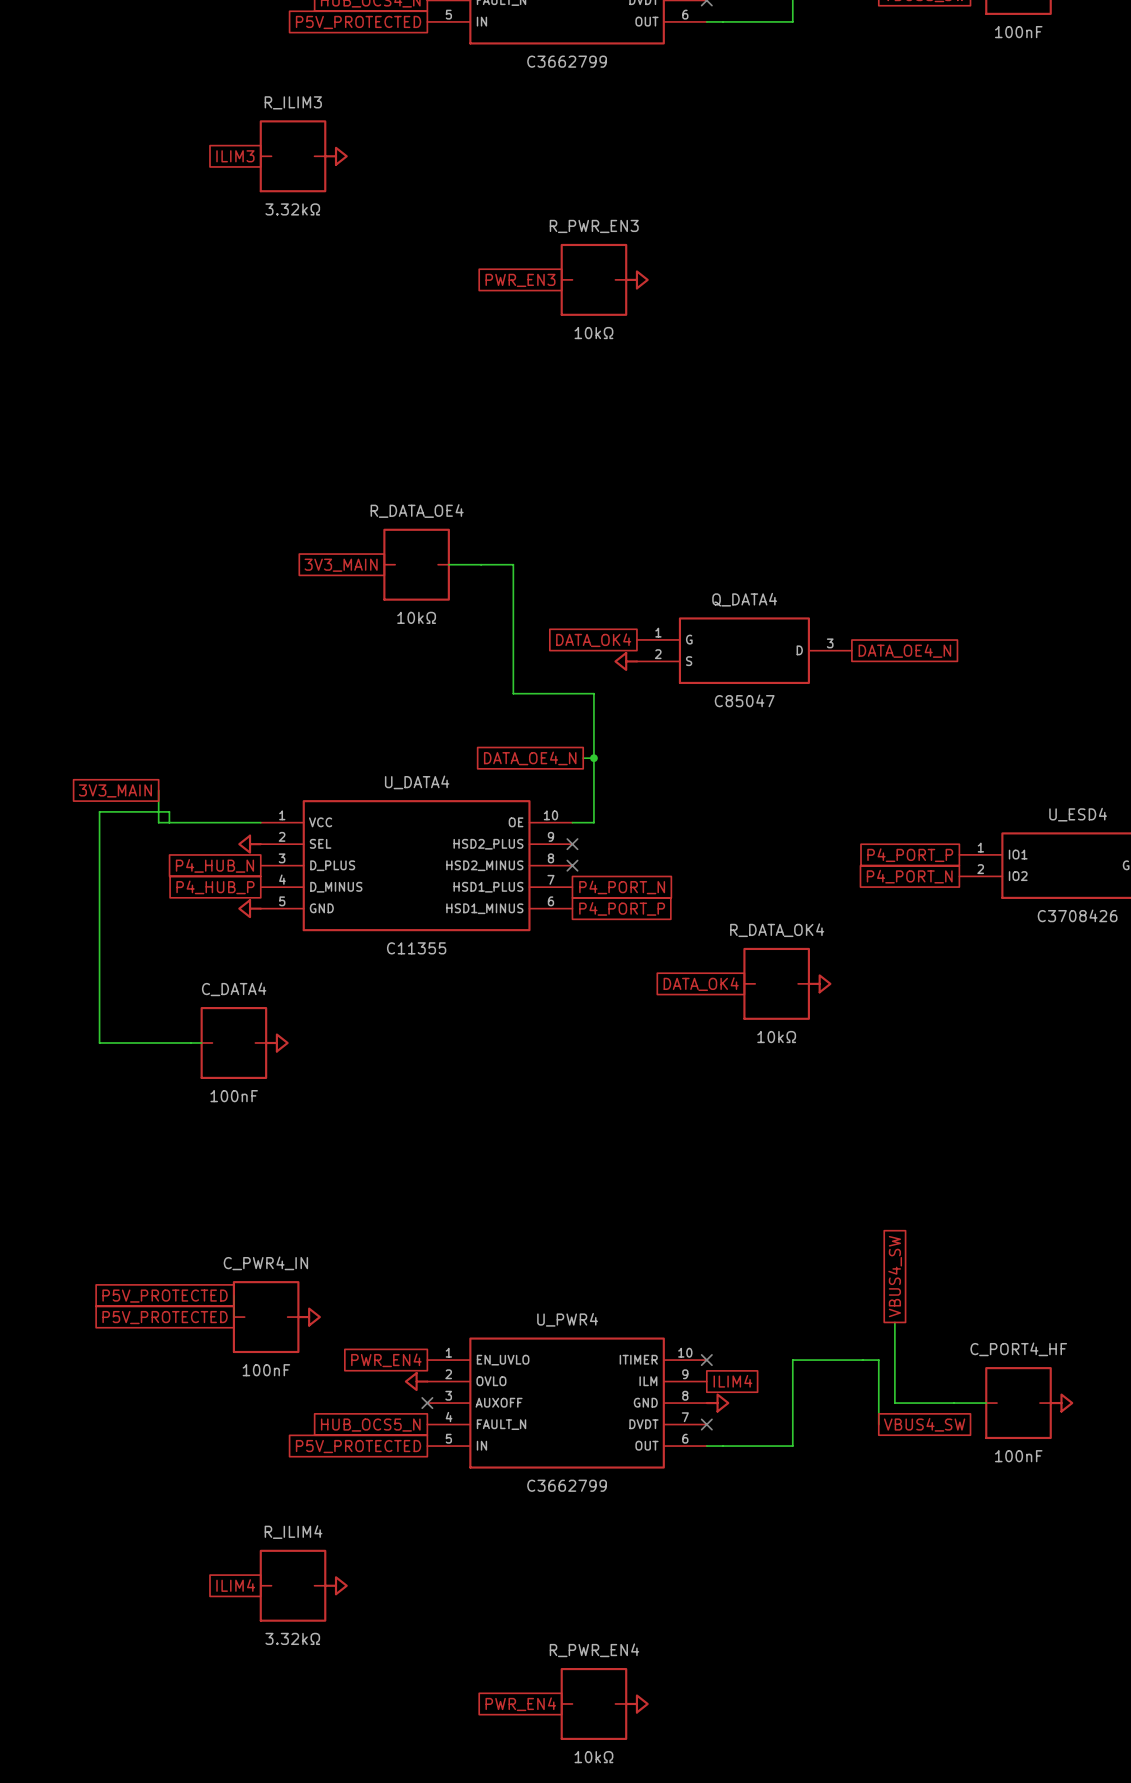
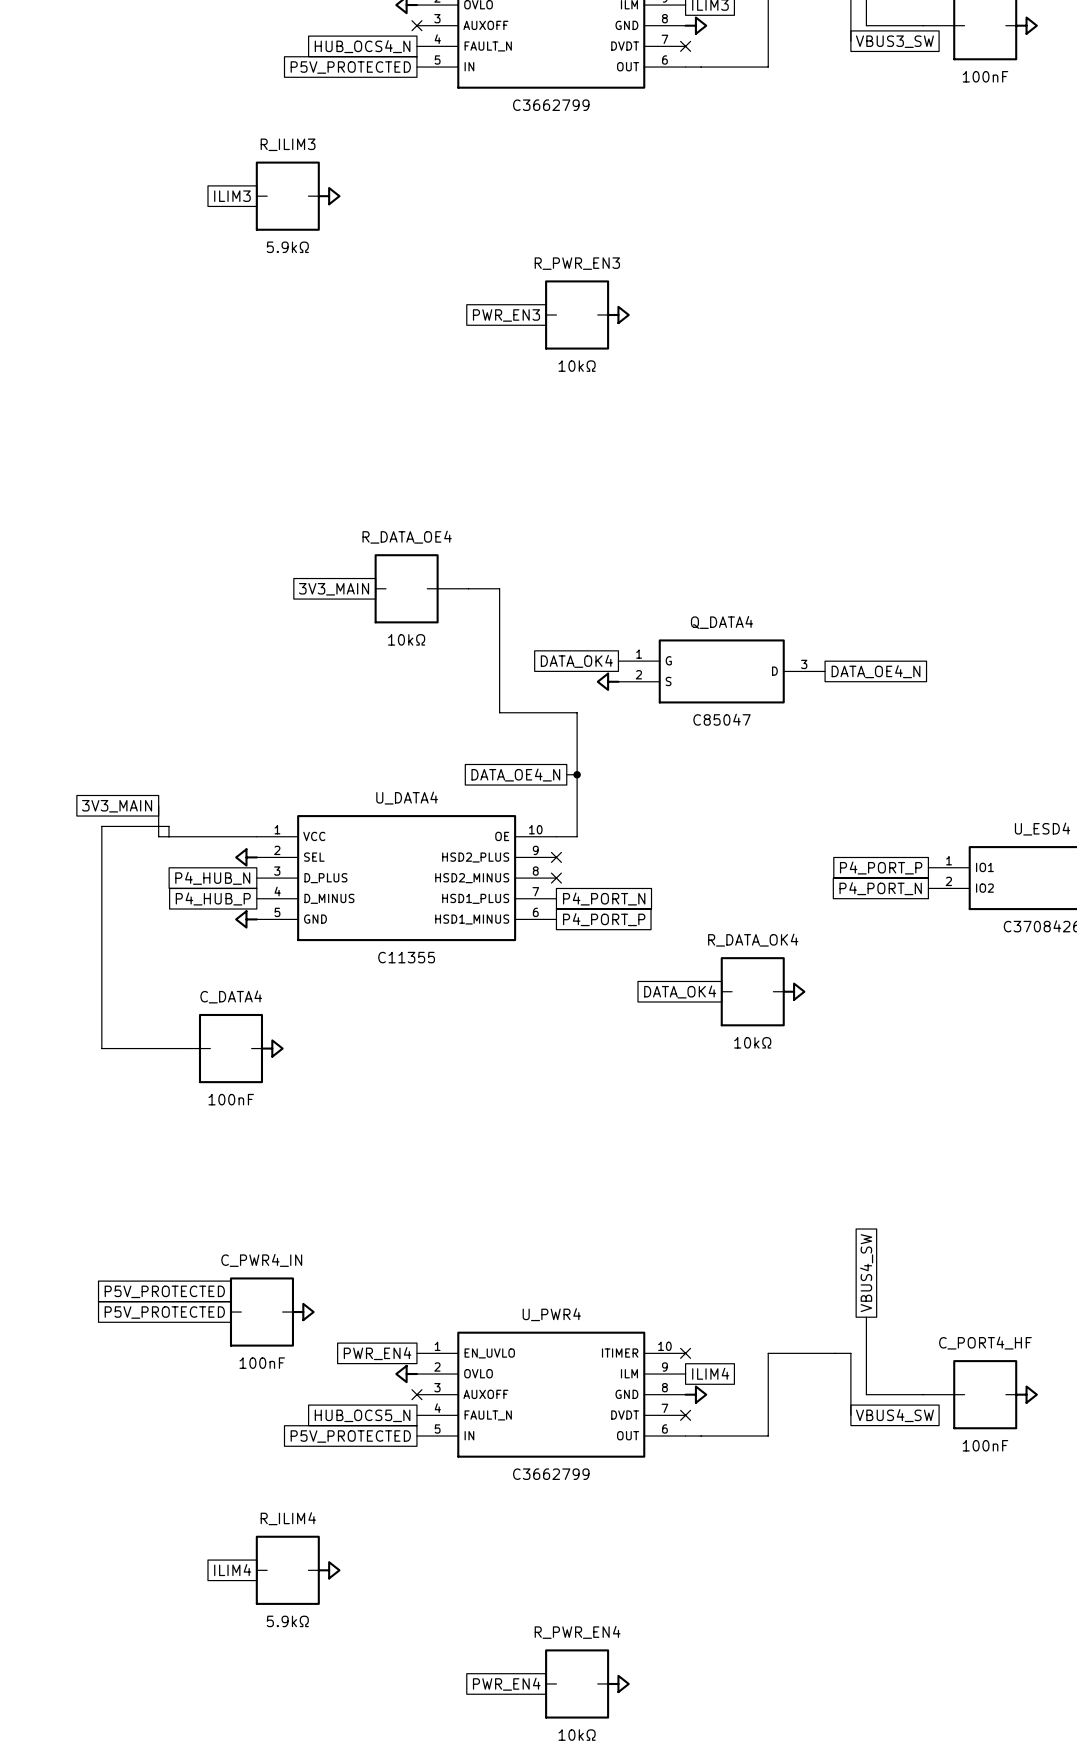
R_ILIM3 value: 3.32kΩ (292, 209) -> 5.9kΩ (287, 247)
R_ILIM4 value: 3.32kΩ (292, 1638) -> 5.9kΩ (287, 1621)

